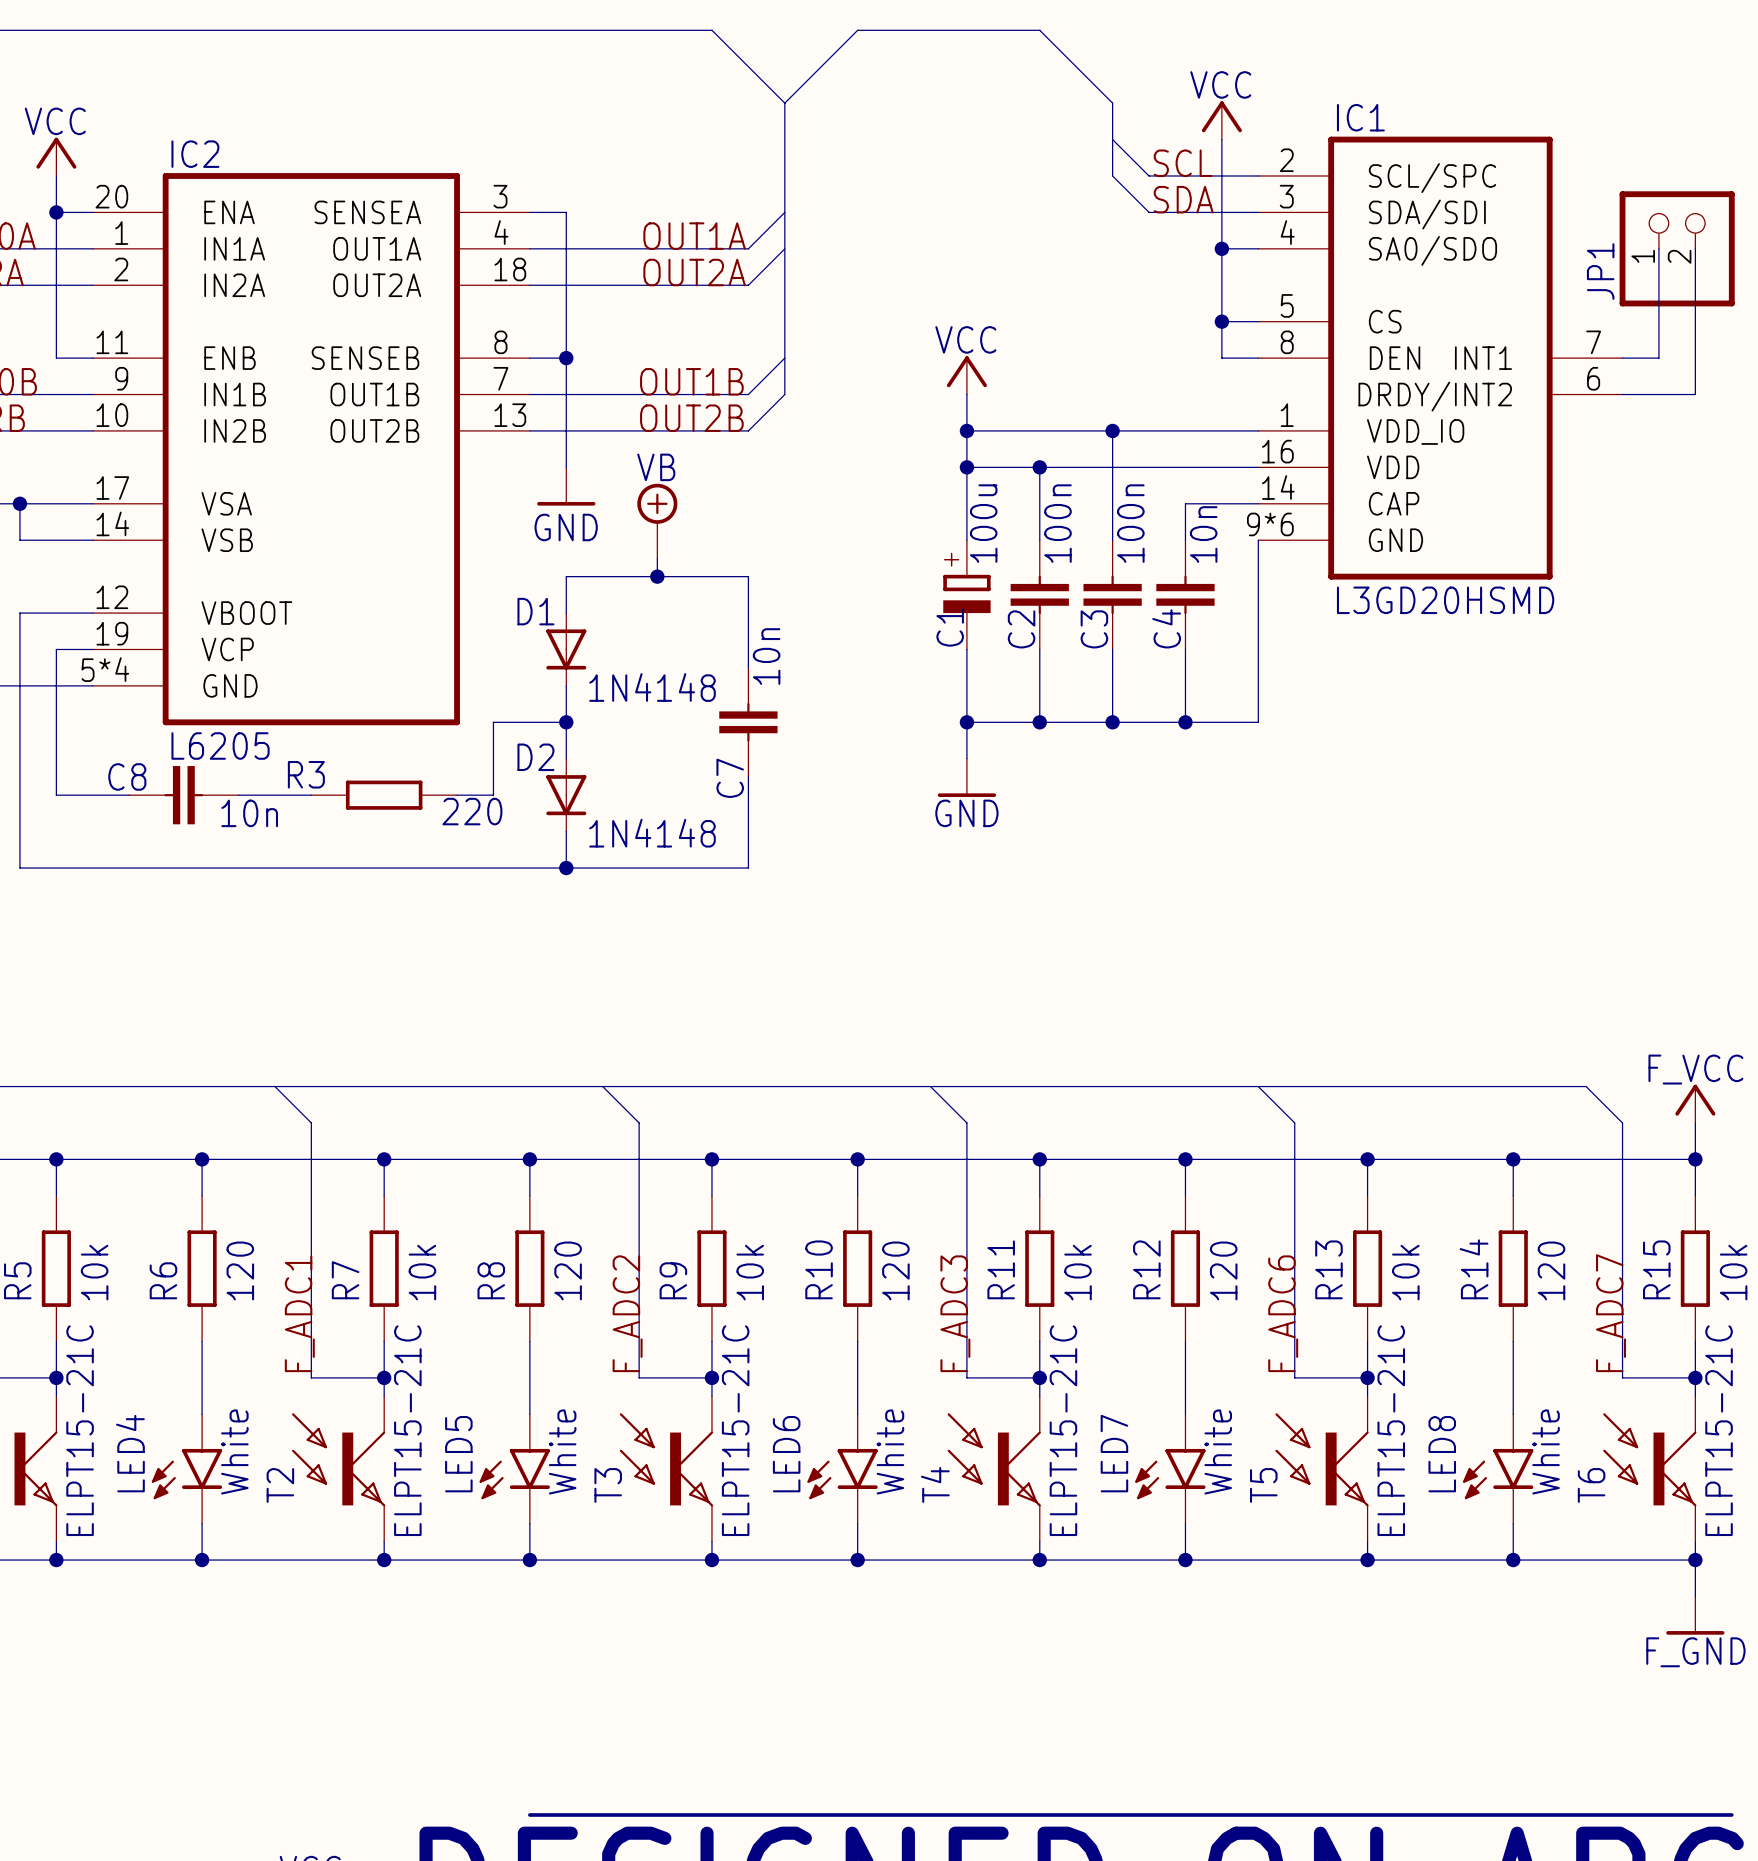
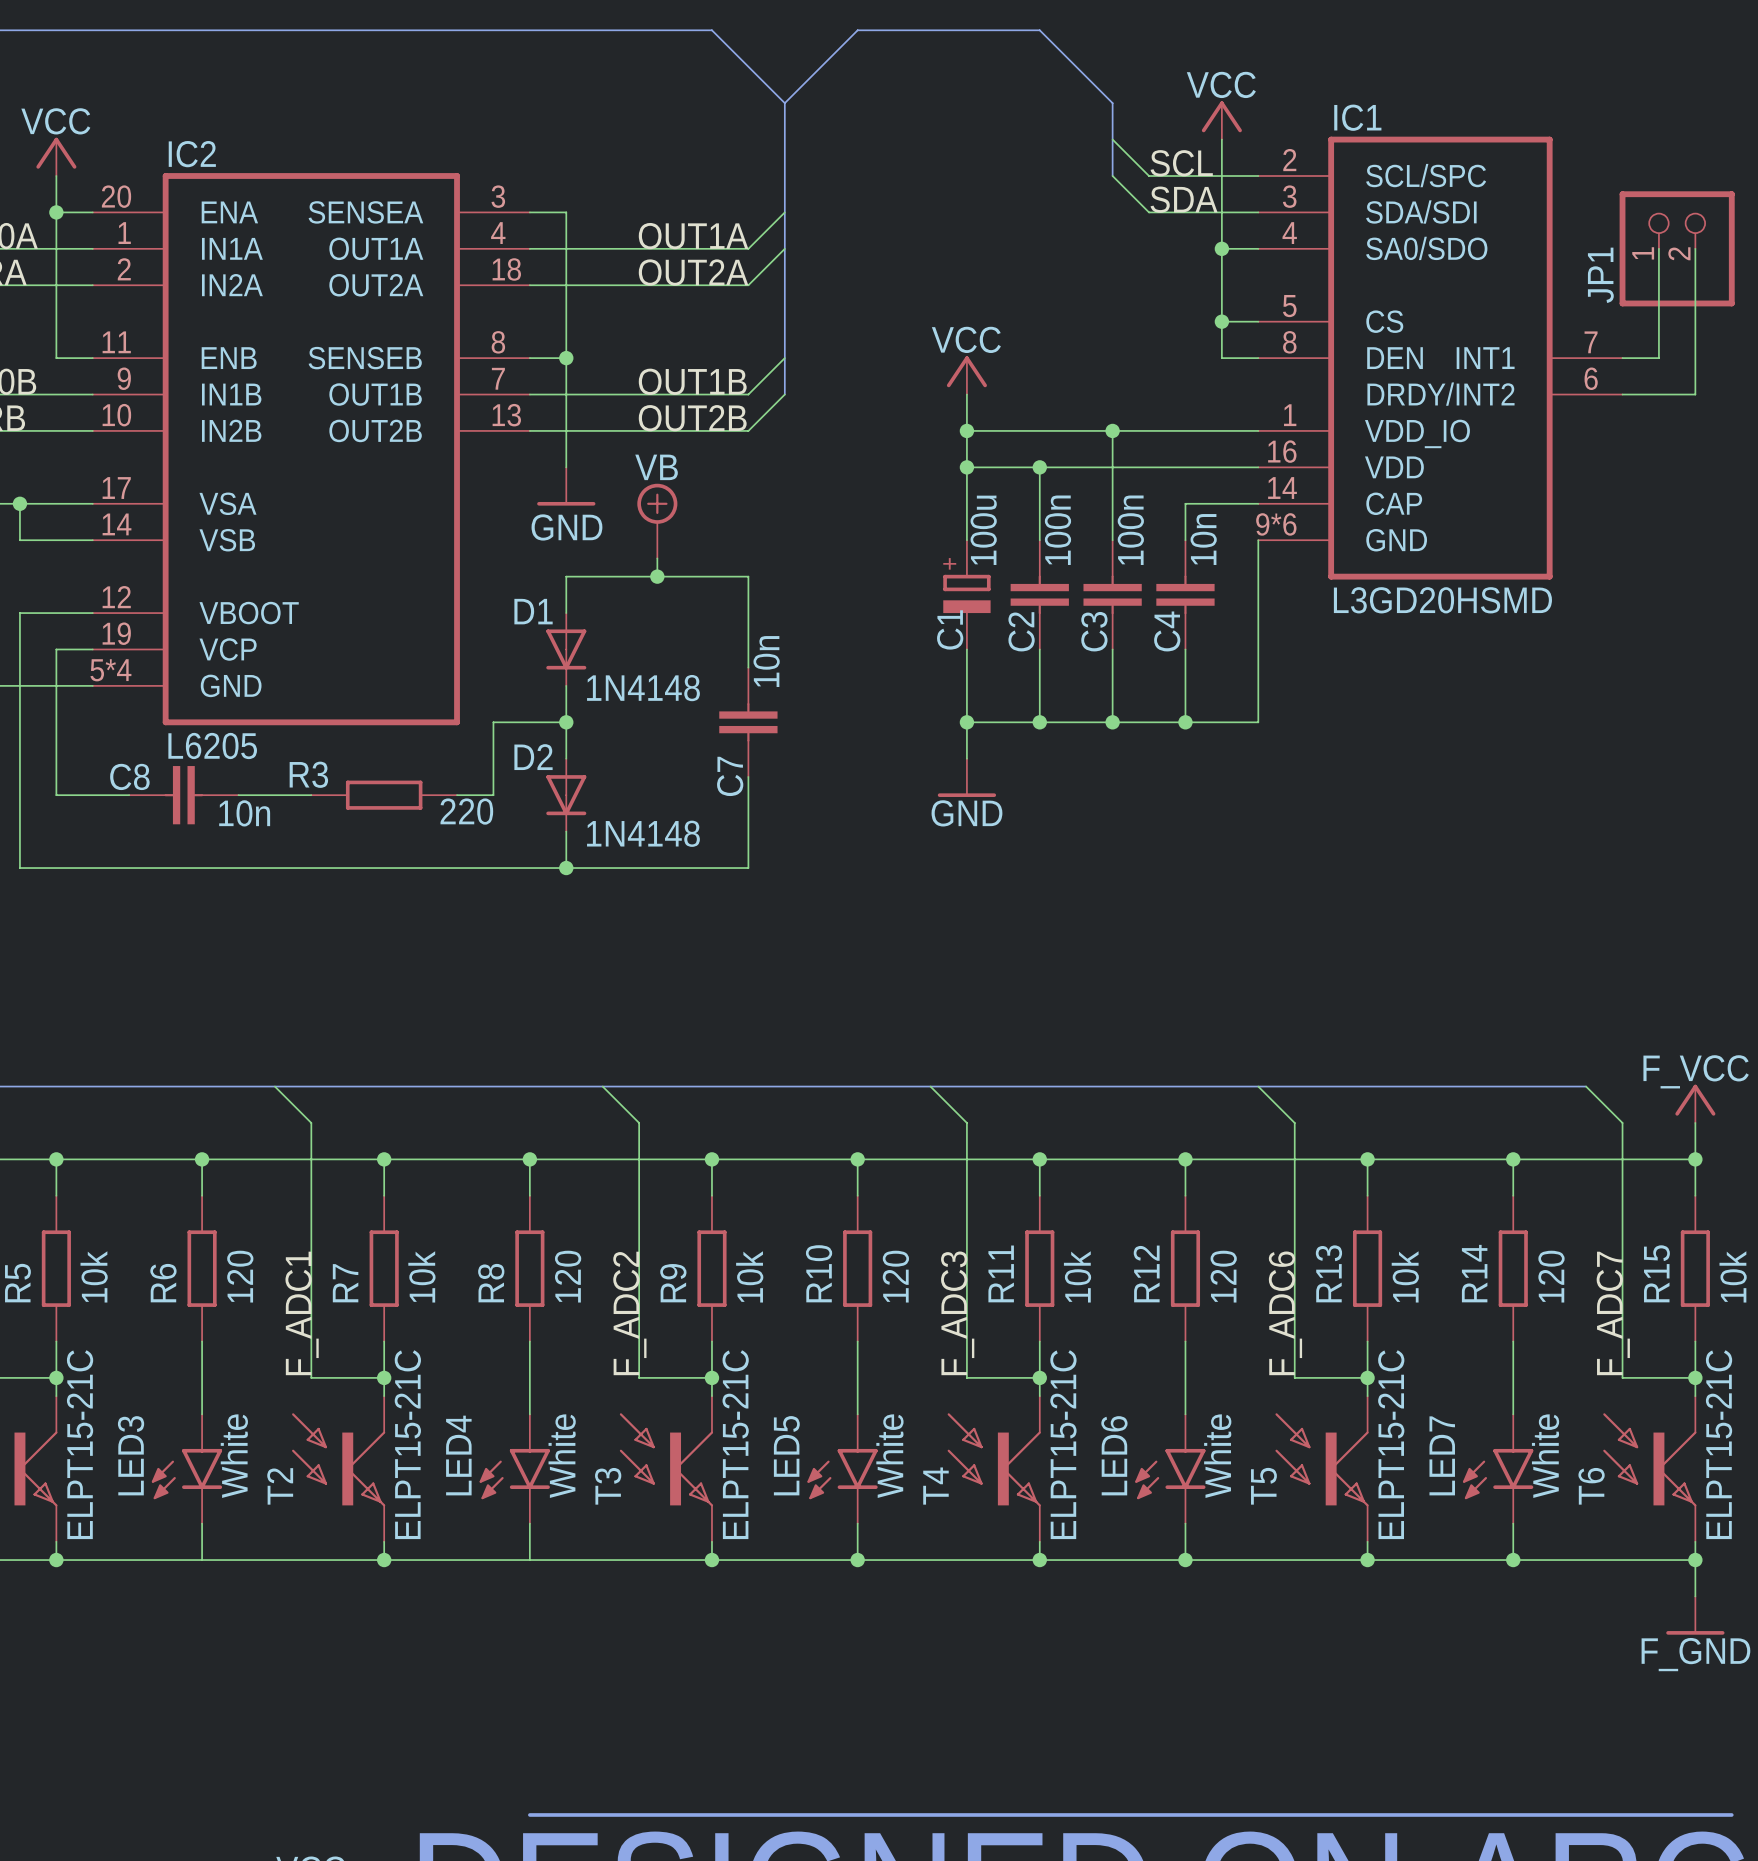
LED4 name: LED4 (130, 1453) -> LED3 (131, 1455)
LED7 name: LED7 (1114, 1453) -> LED6 (1114, 1455)
LED5 name: LED5 (458, 1454) -> LED4 (458, 1455)
LED6 name: LED6 (786, 1454) -> LED5 (786, 1455)
LED8 name: LED8 (1442, 1454) -> LED7 (1442, 1455)
junction: (202, 1560) -> none
junction: (529, 1560) -> none

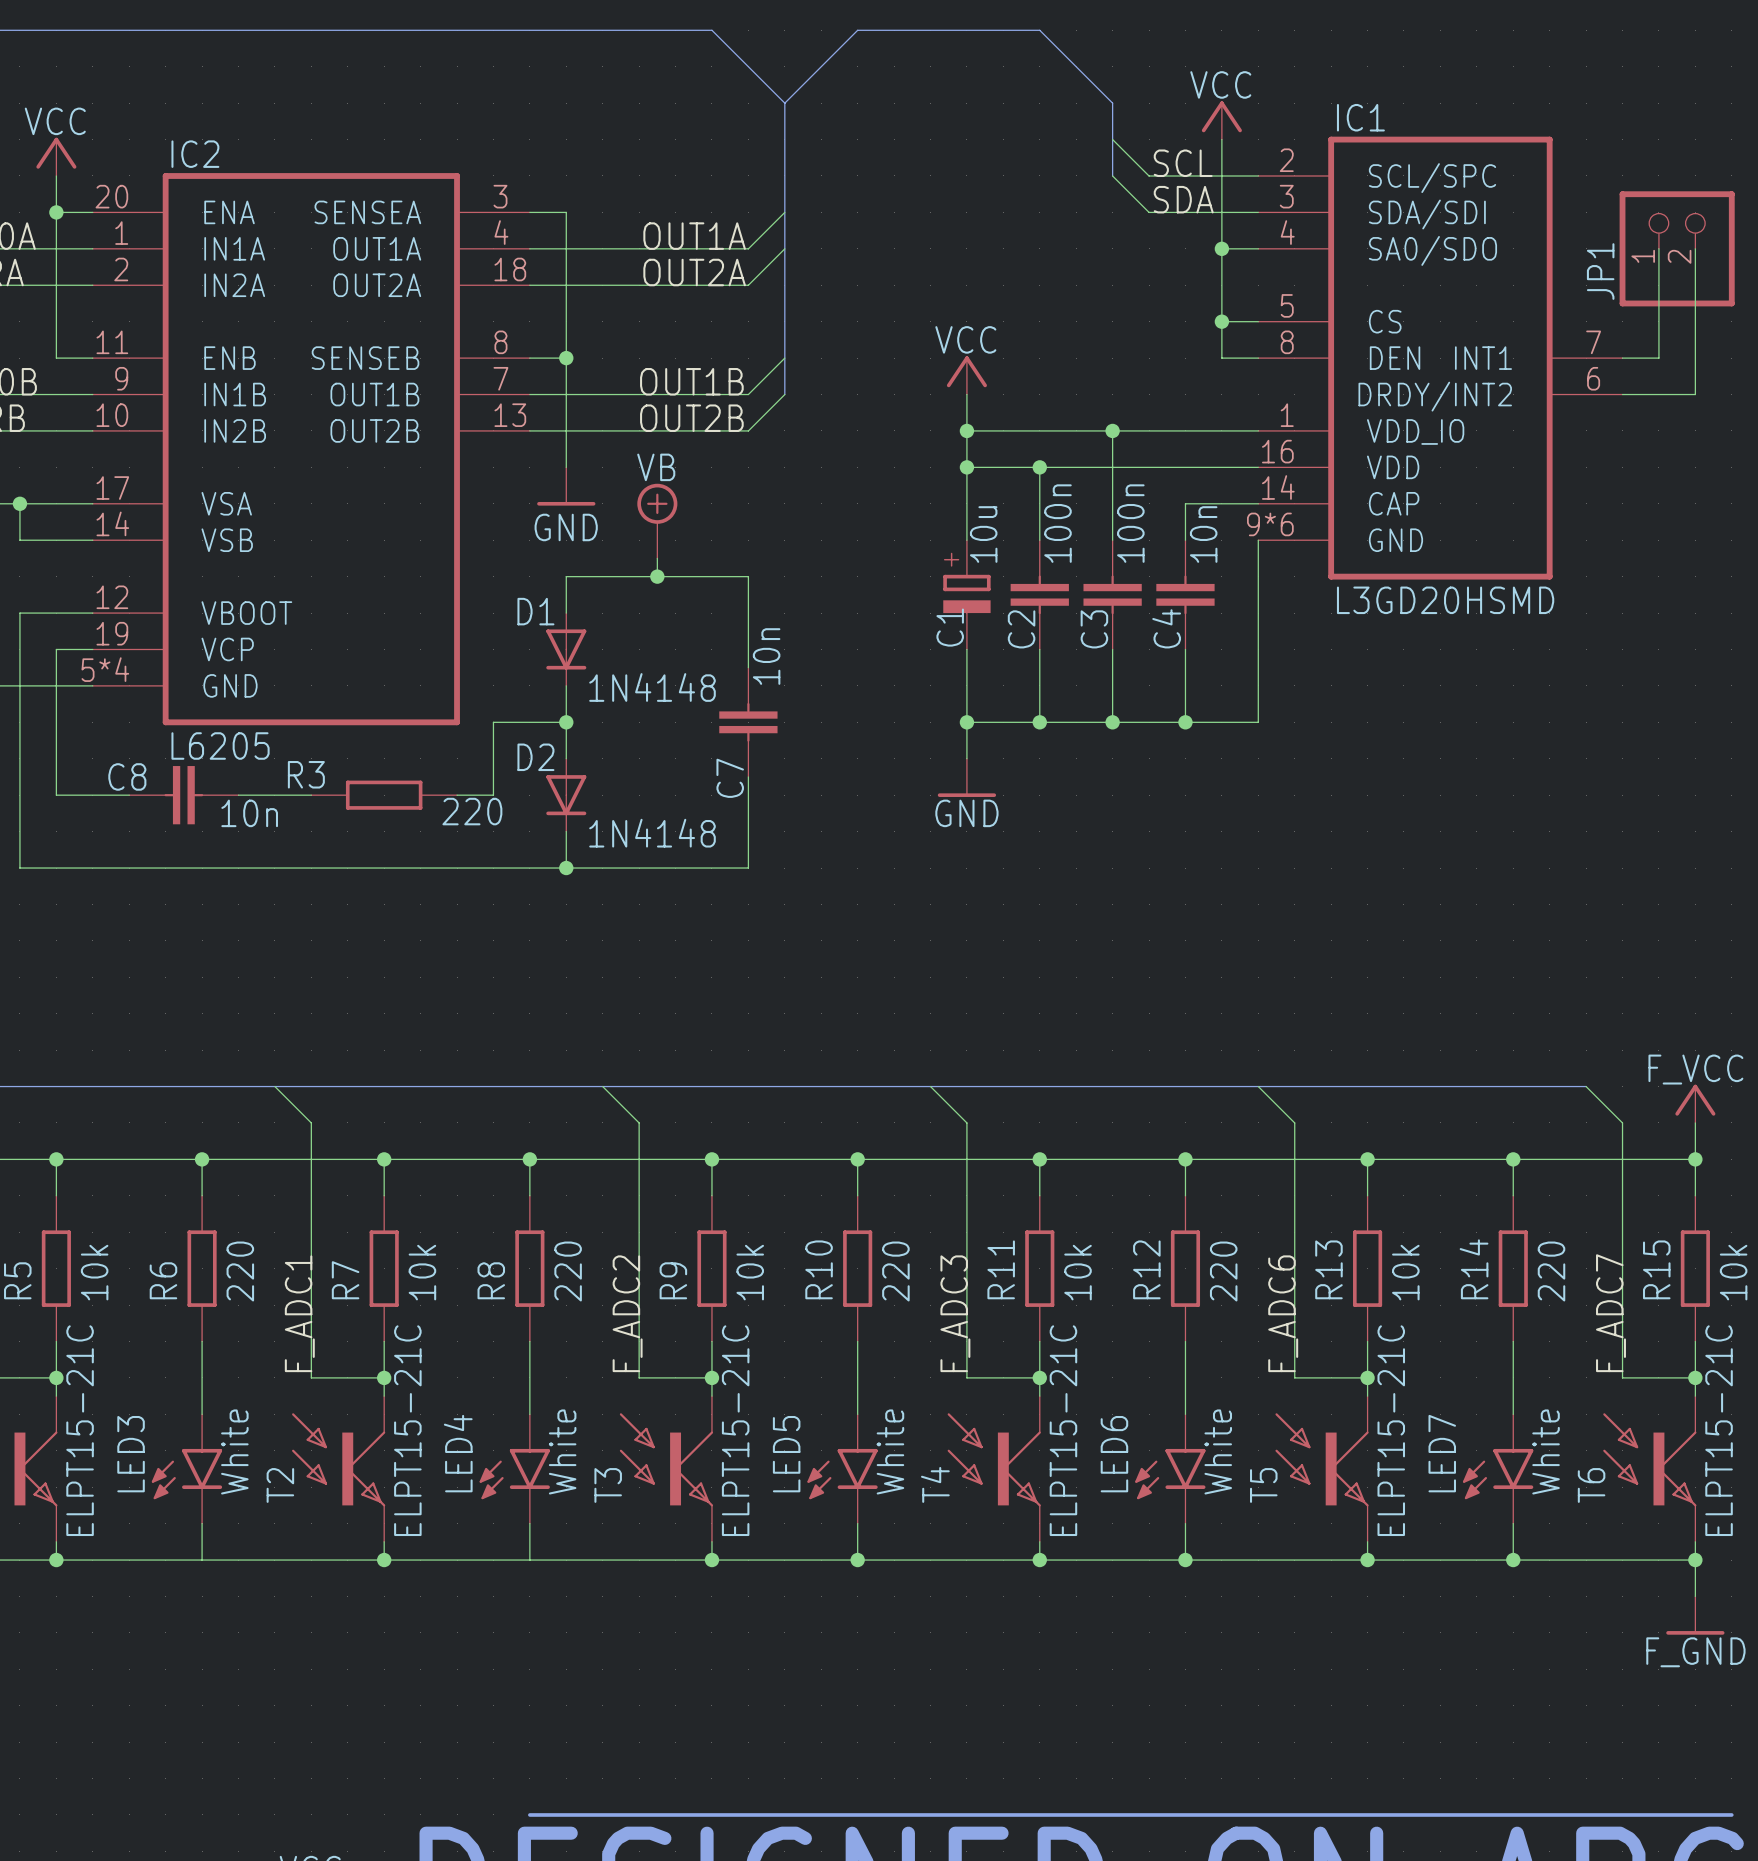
C1 value: 100u (983, 530) -> 10u (983, 534)
R6 value: 120 (240, 1276) -> 220 (240, 1271)
R8 value: 120 (568, 1276) -> 220 (568, 1271)
R10 value: 120 (895, 1276) -> 220 (895, 1271)
R12 value: 120 (1223, 1276) -> 220 (1223, 1271)
R14 value: 120 (1551, 1276) -> 220 (1551, 1271)

